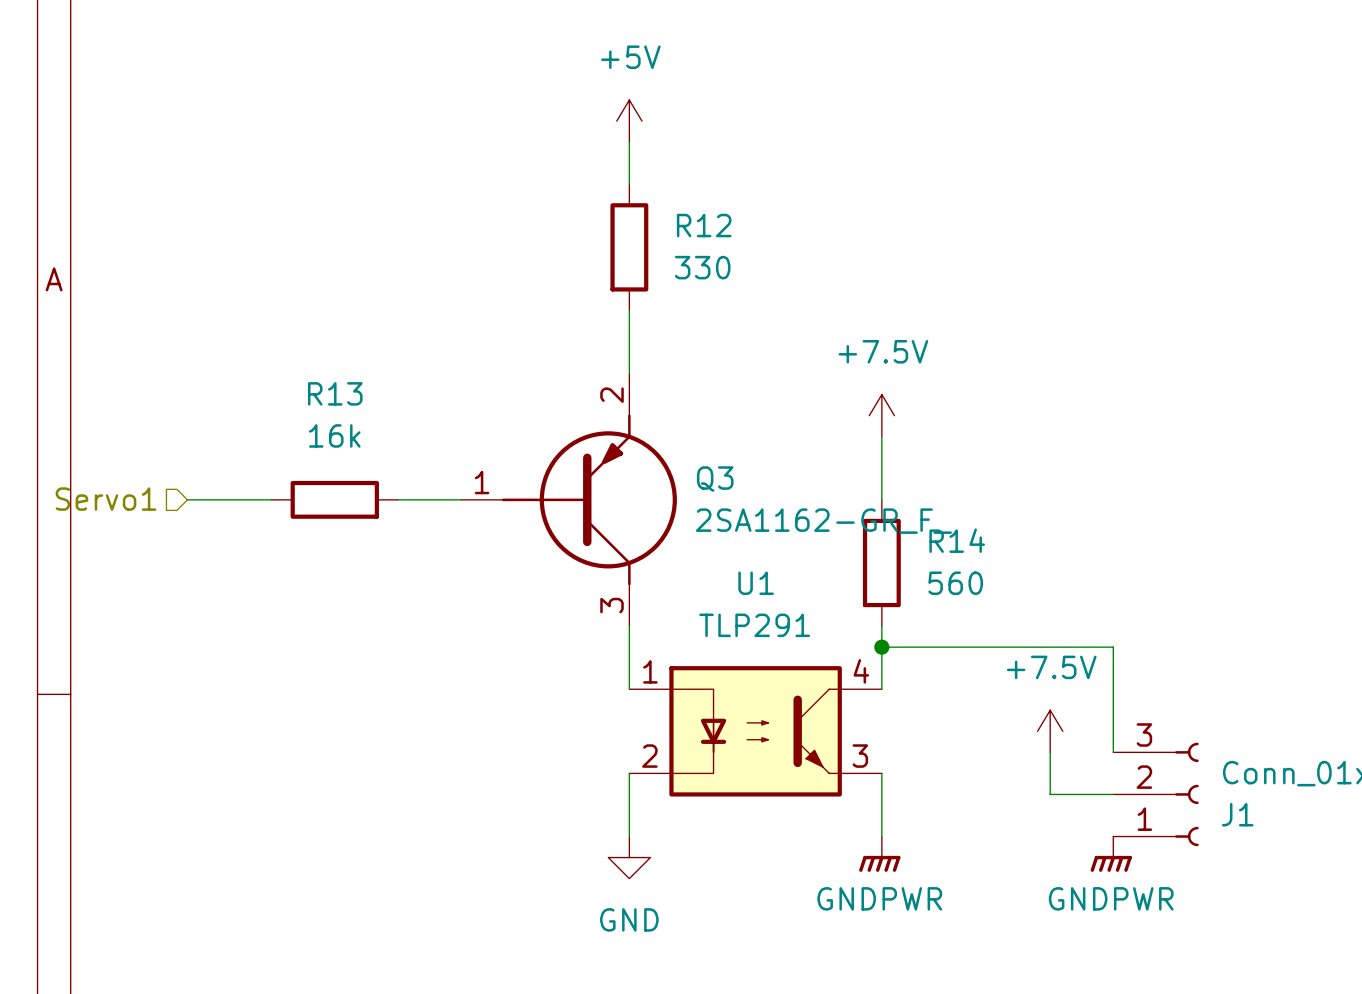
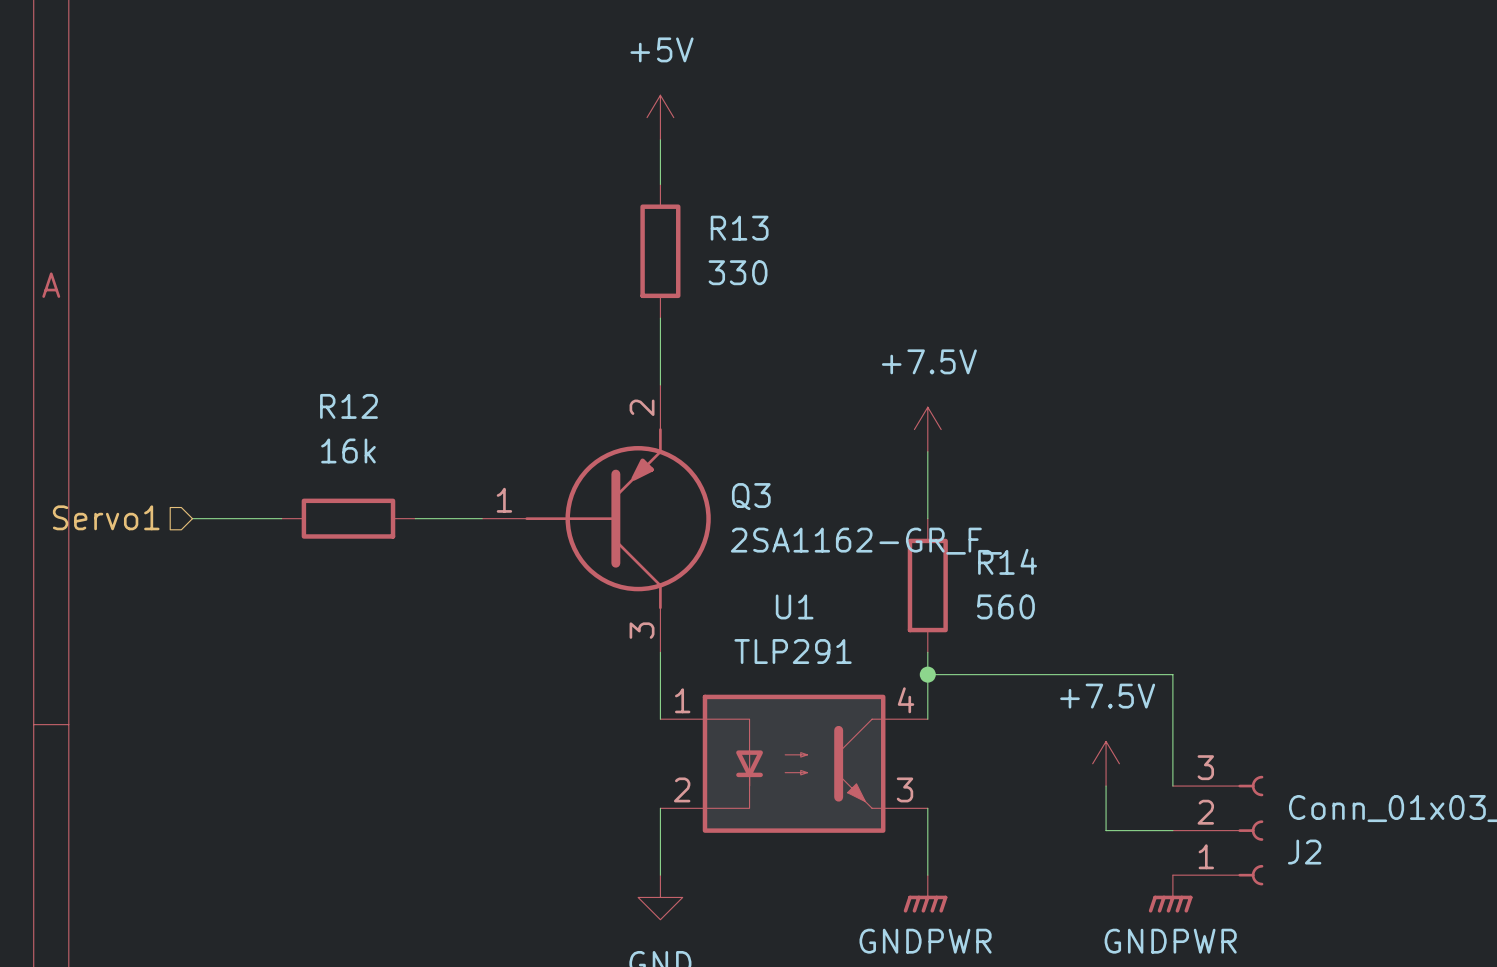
R12 name: R12 (704, 225) -> R13 (739, 228)
R13 name: R13 (335, 393) -> R12 (349, 406)
J1 name: J1 (1237, 814) -> J2 (1304, 852)

